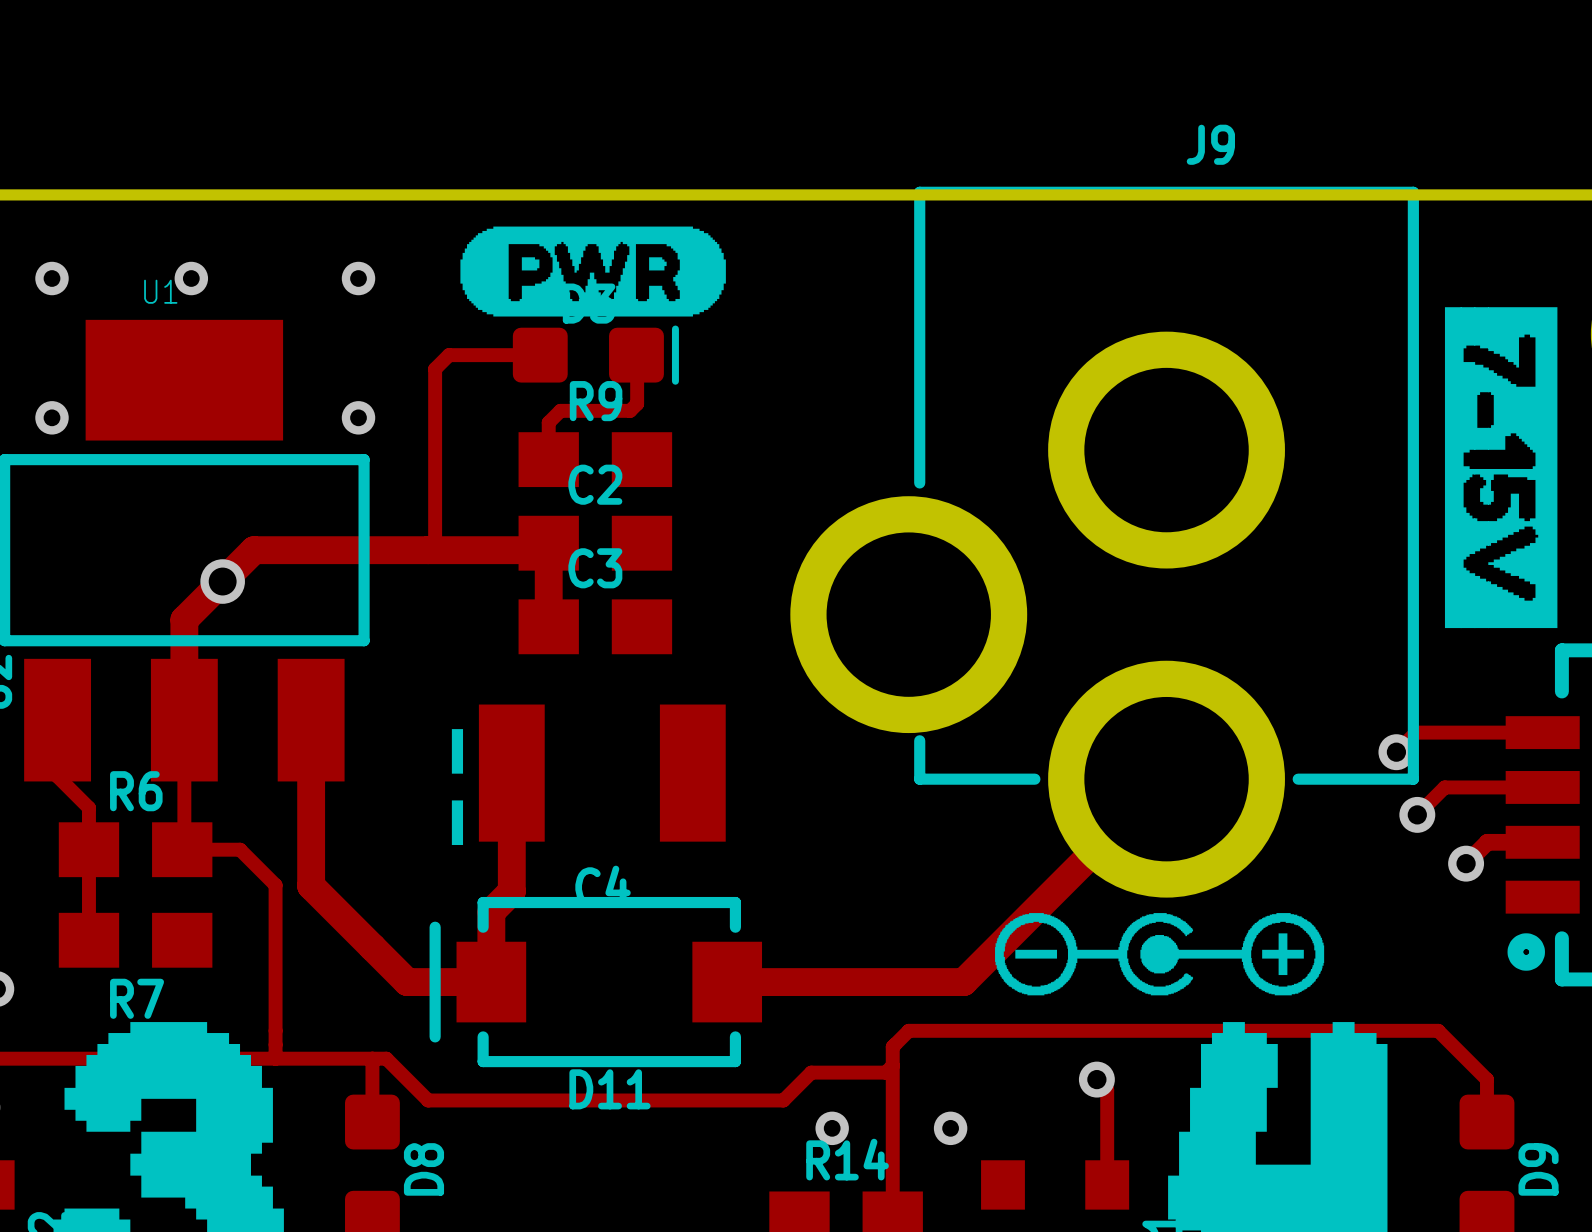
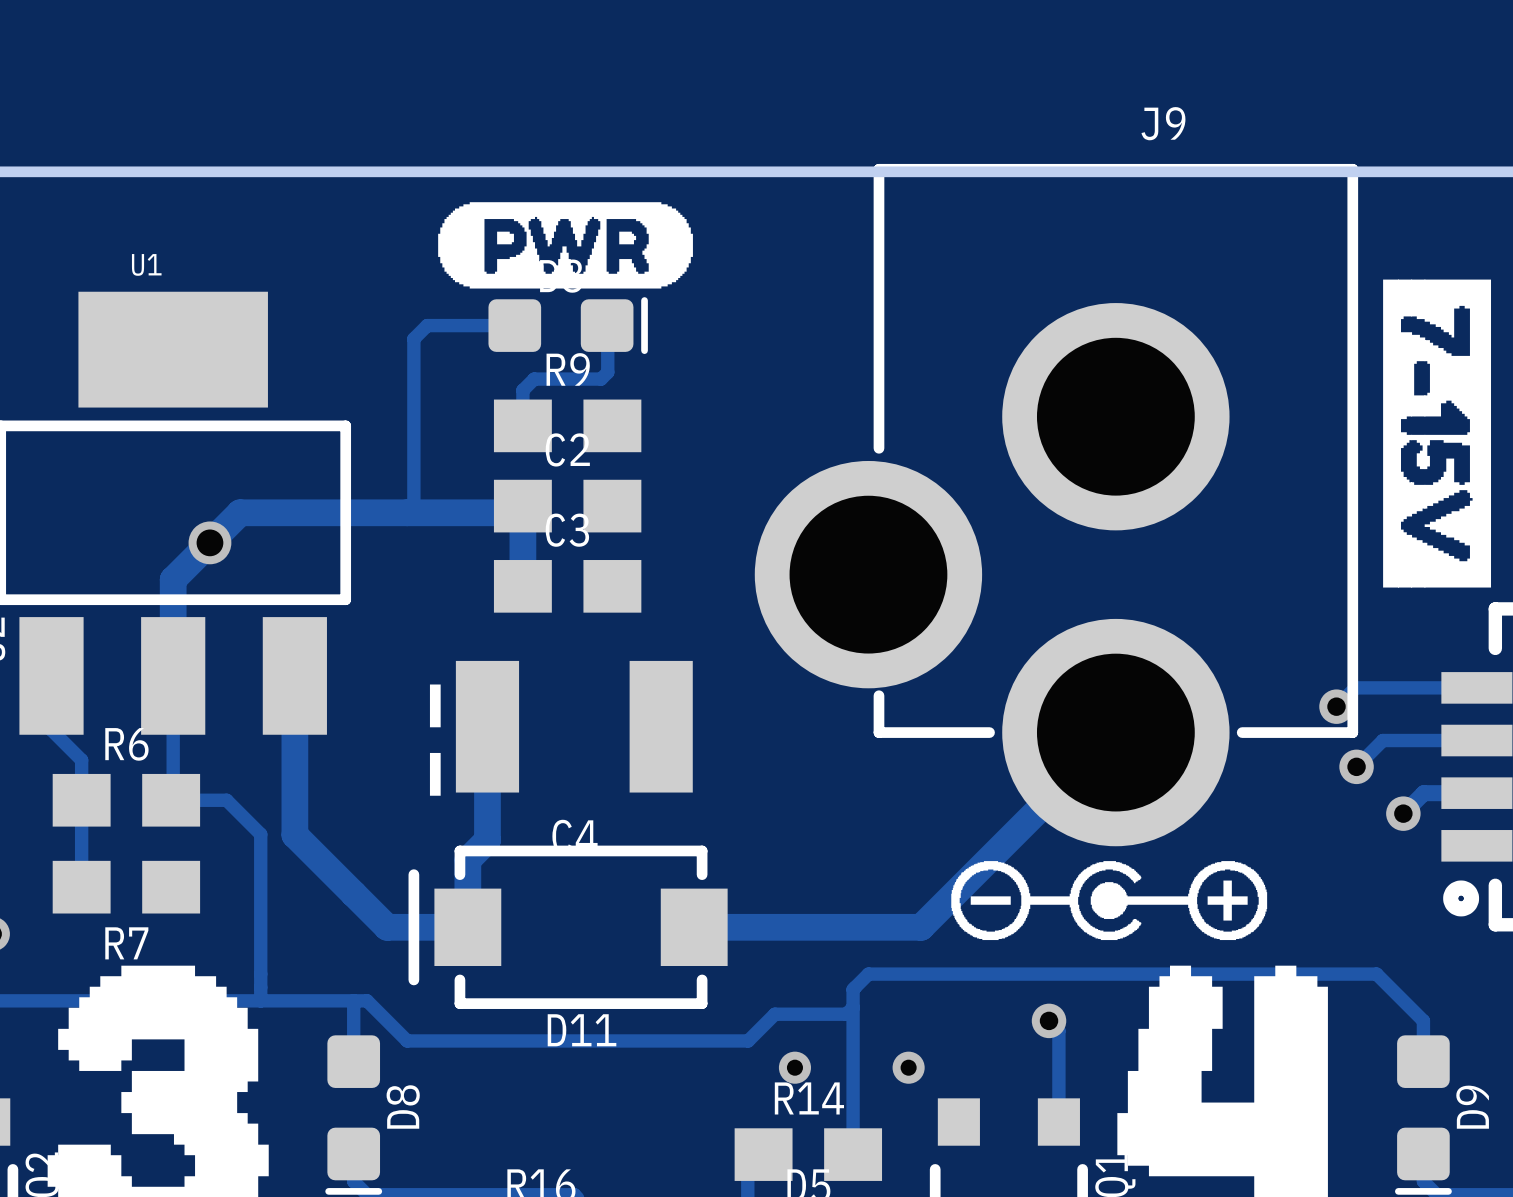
via: (52, 278) -> none
via: (191, 278) -> none
via: (358, 278) -> none
via: (52, 417) -> none
via: (358, 417) -> none

